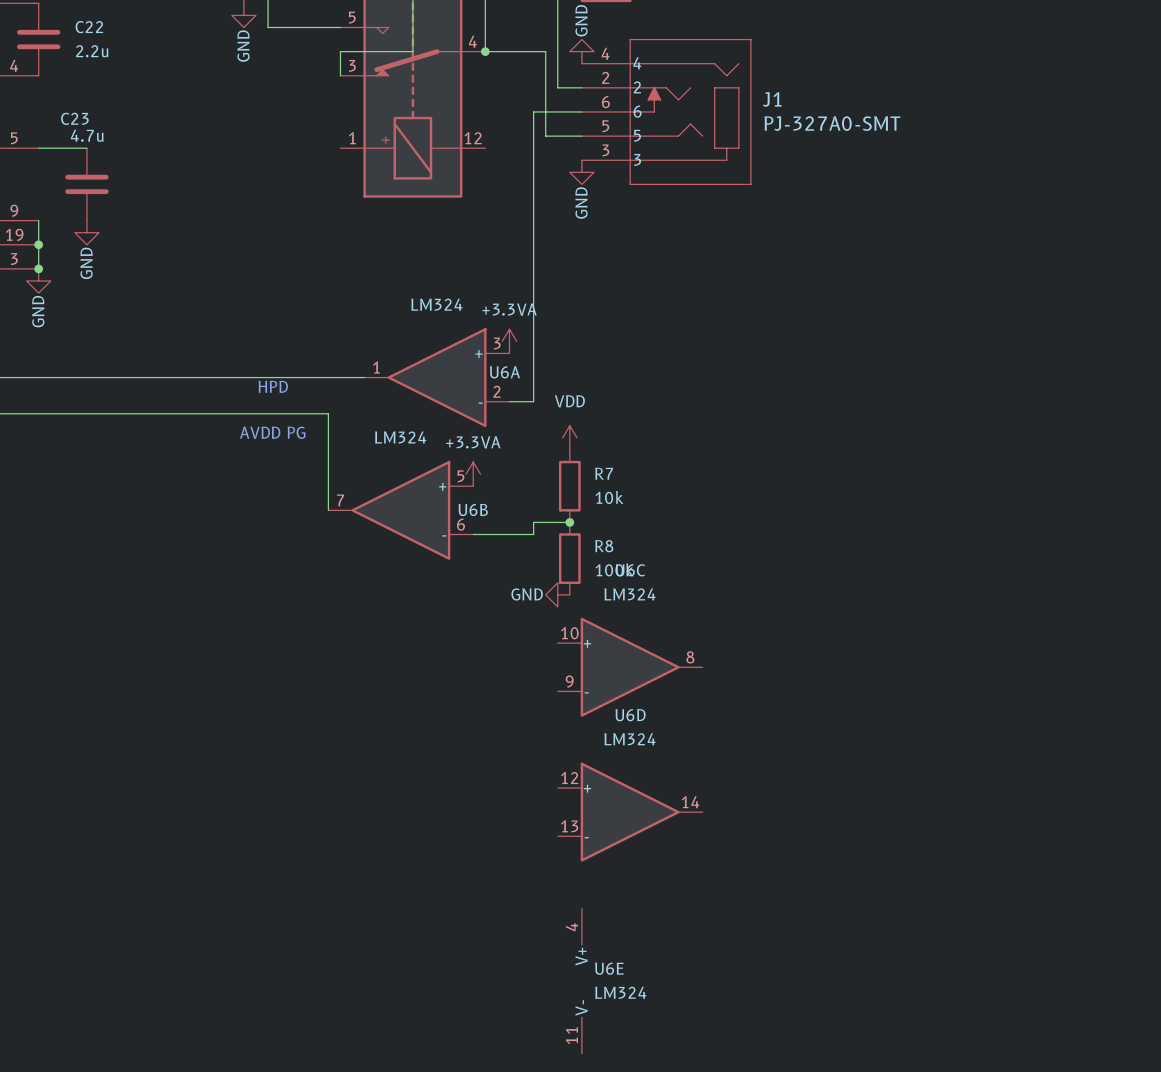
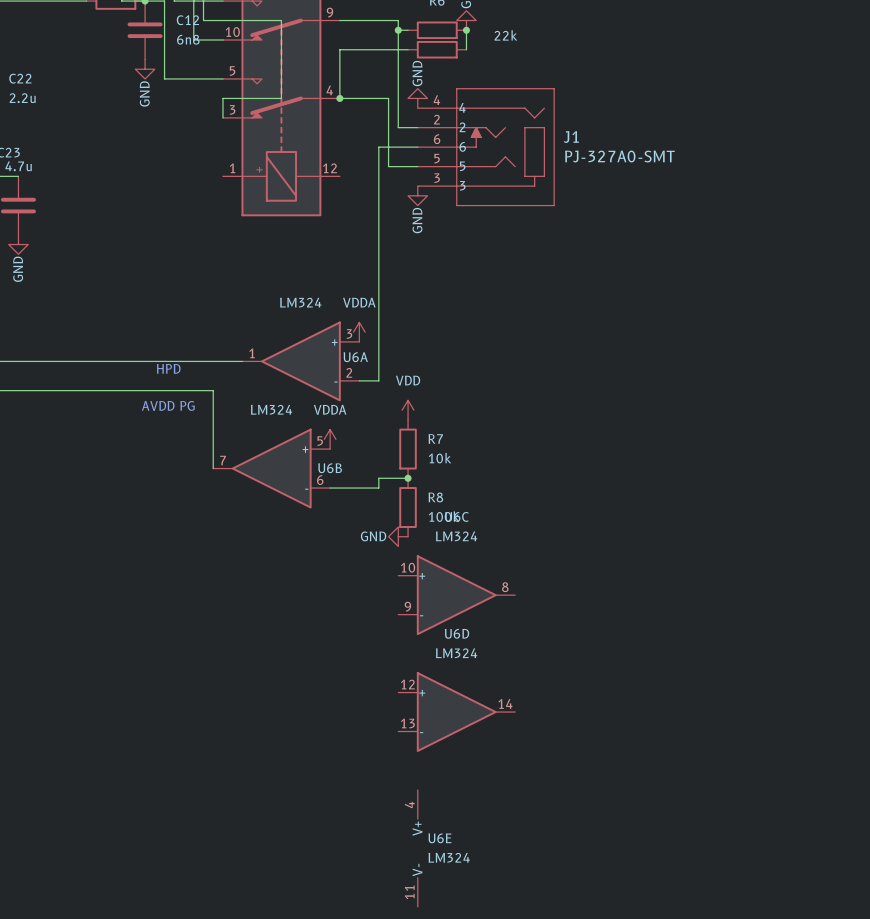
power symbol: +3.3VA (509, 341) -> VDDA (359, 332)
power symbol: +3.3VA (473, 474) -> VDDA (330, 439)

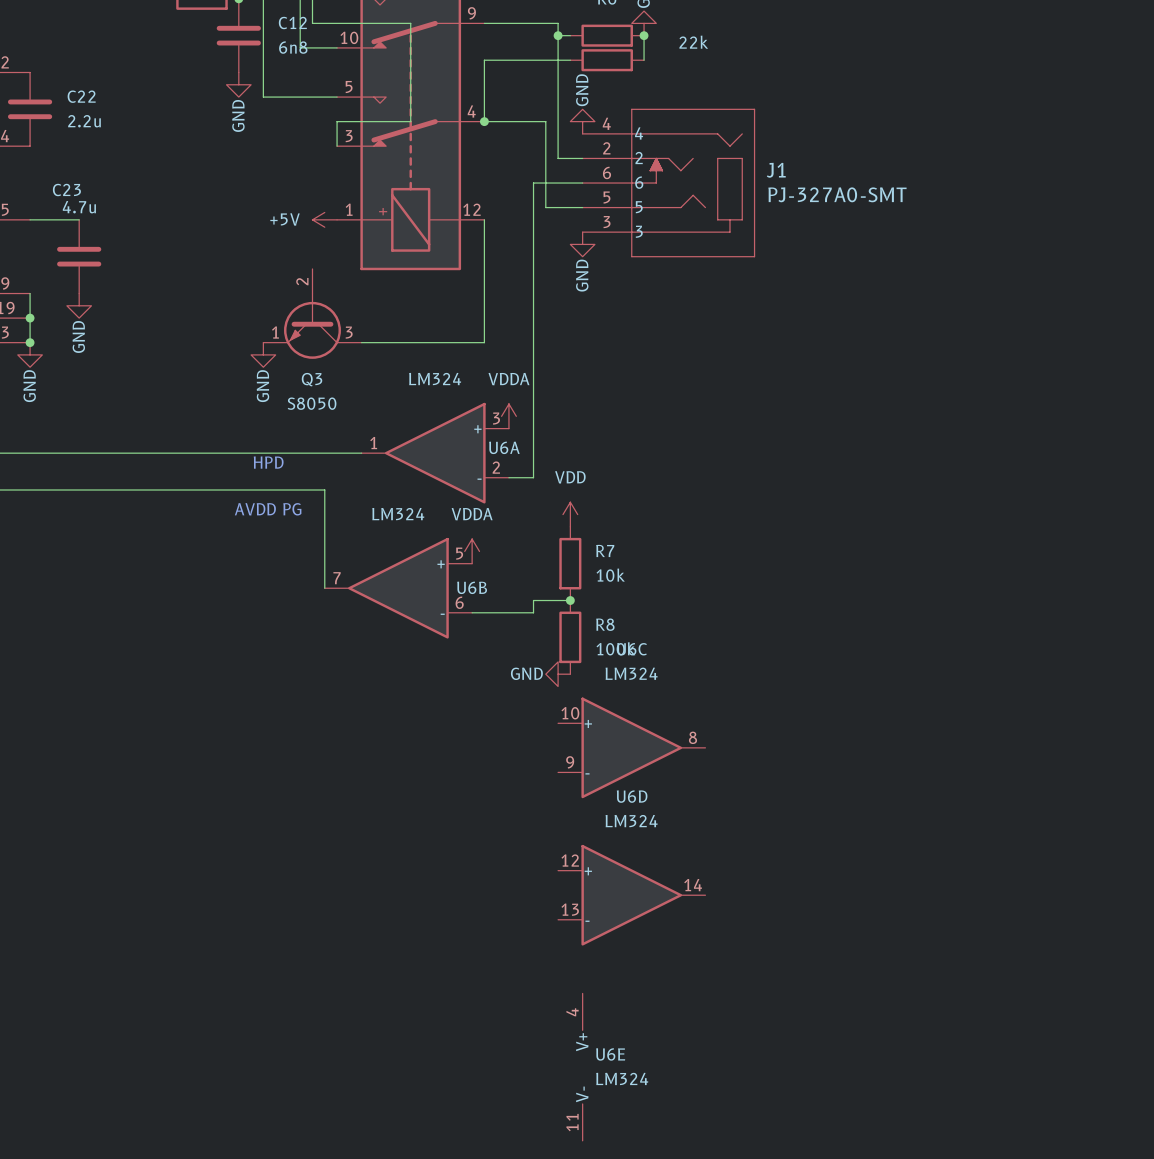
power symbol: none -> +5V (324, 219)
wire: none -> (484, 219) (484, 342) (361, 342)
Q3: none -> S8050 (312, 313)
power symbol: none -> GND (263, 354)

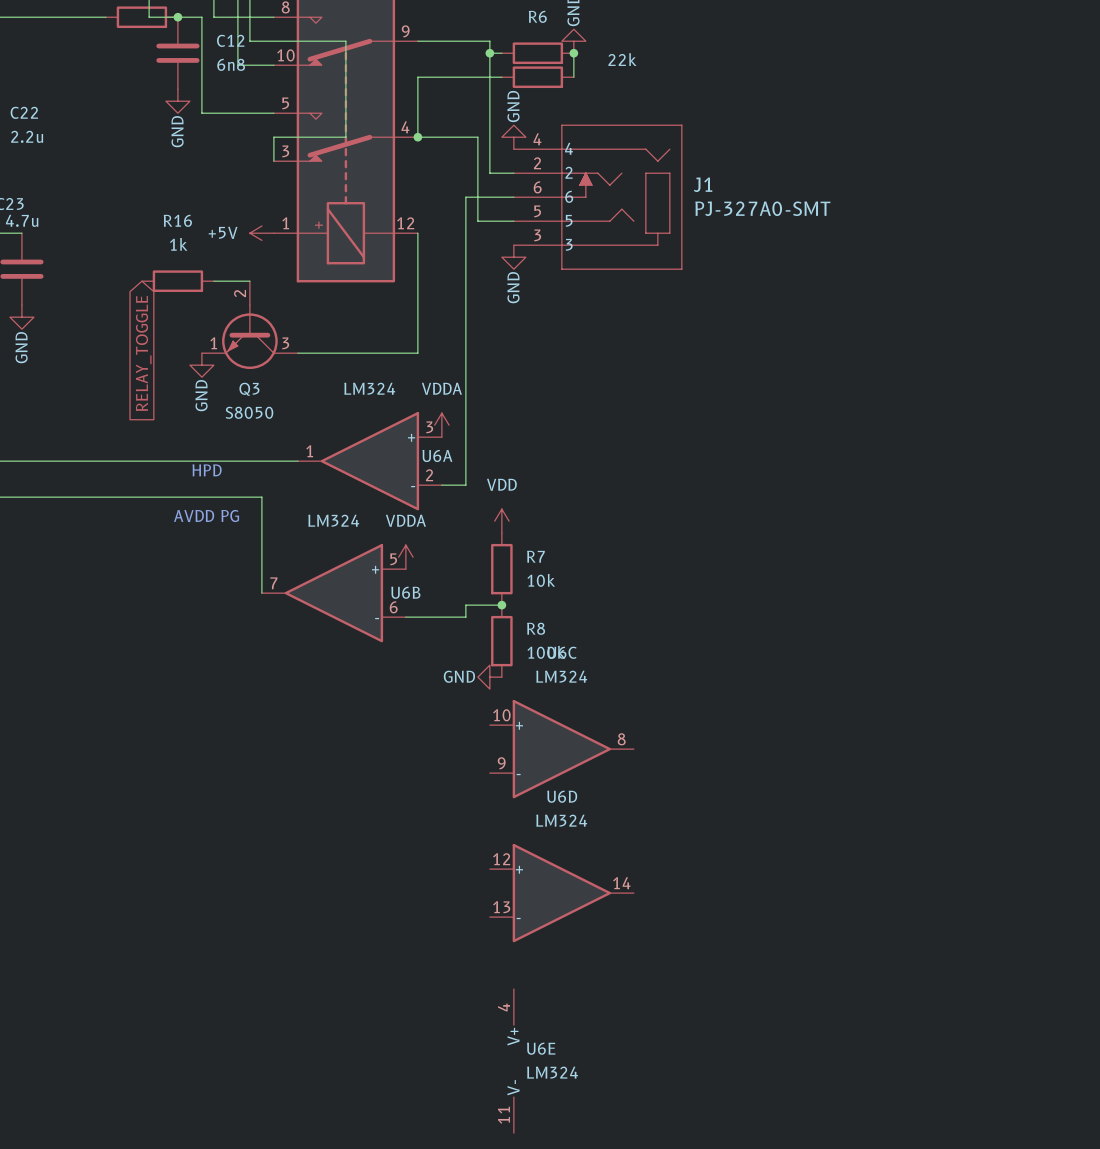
R16: none -> 1k (177, 281)
wire: none -> (213, 281) (249, 281)
global label: none -> RELAY_TOGGLE (143, 353)

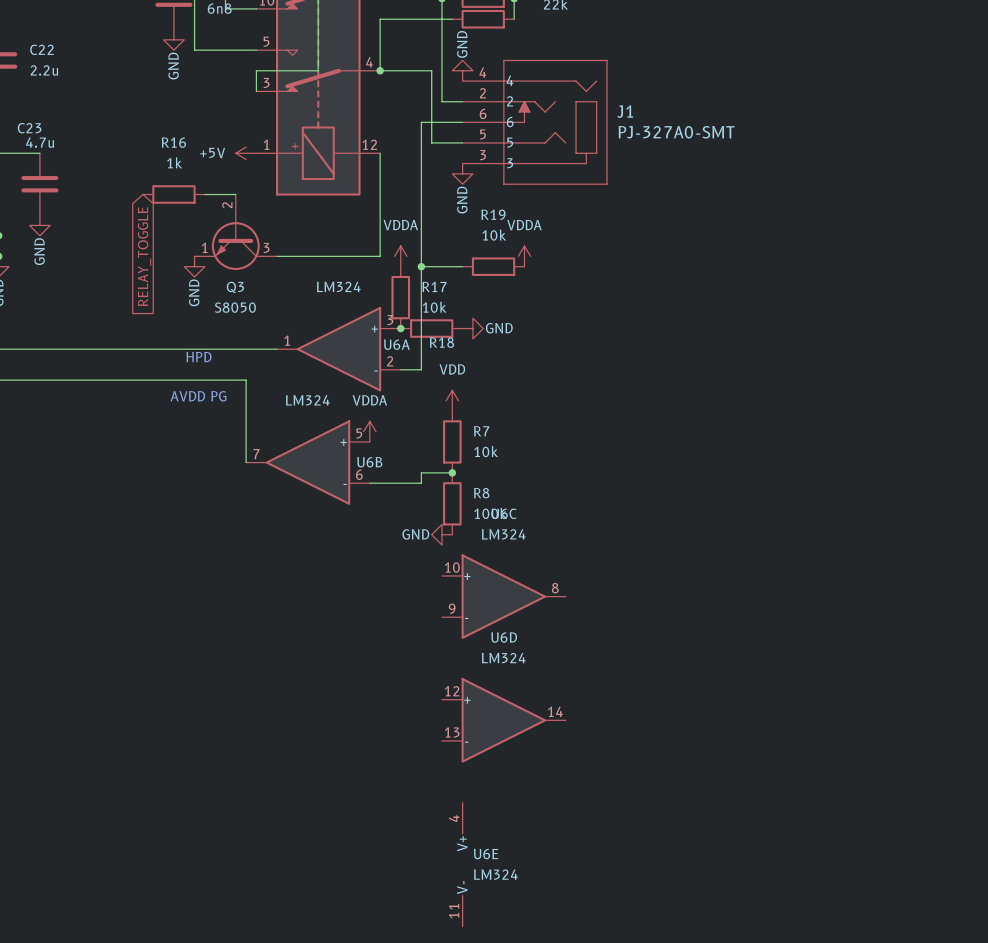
power symbol: none -> VDDA (524, 256)
wire: none -> (421, 266) (462, 266)
junction: none -> (421, 266)
R19: none -> 10k (493, 266)
R17: none -> 10k (400, 297)
power symbol position: VDDA (441, 425) -> VDDA (400, 256)
junction: none -> (400, 328)
R18: none -> (431, 328)
power symbol: none -> GND (472, 328)

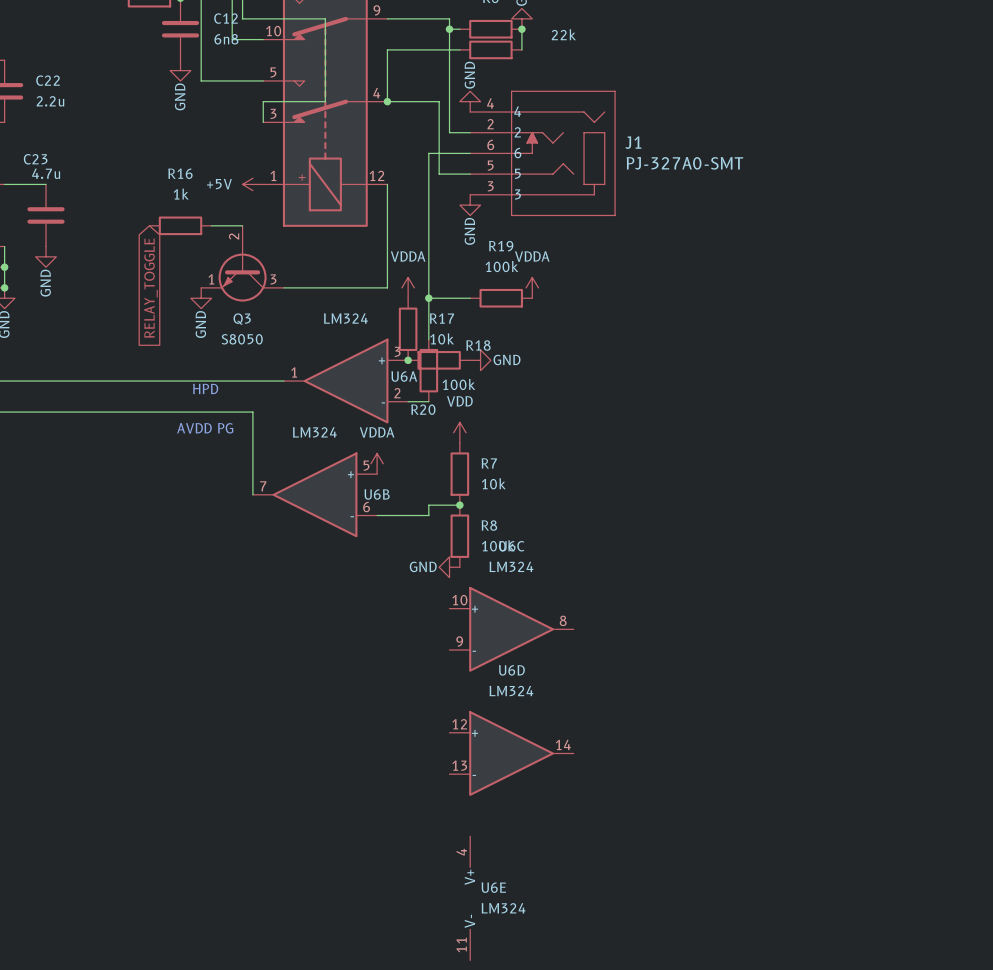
R19 value: 10k (494, 235) -> 100k (501, 266)
wire: (421, 307) (421, 369) -> none
R20: none -> 100k (428, 370)
R18 name position: R18 (441, 342) -> R18 (478, 345)

